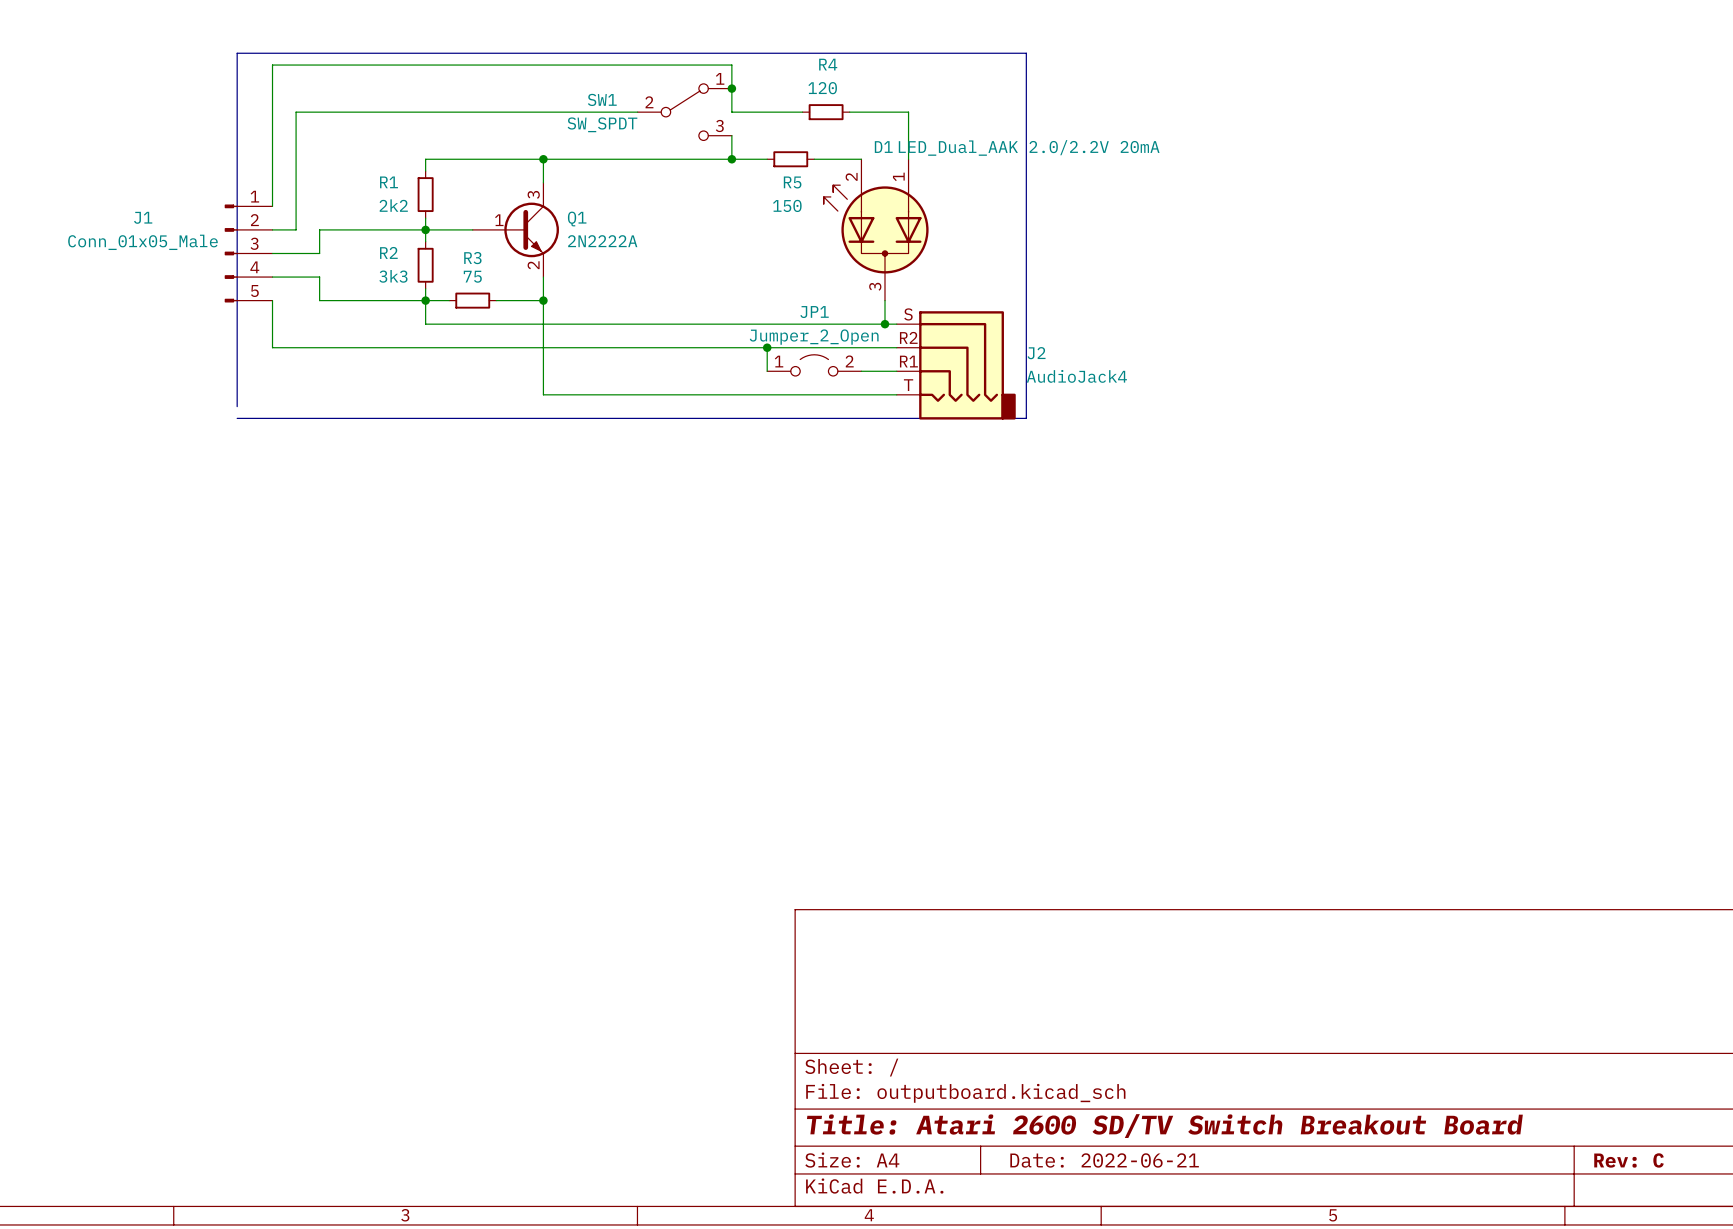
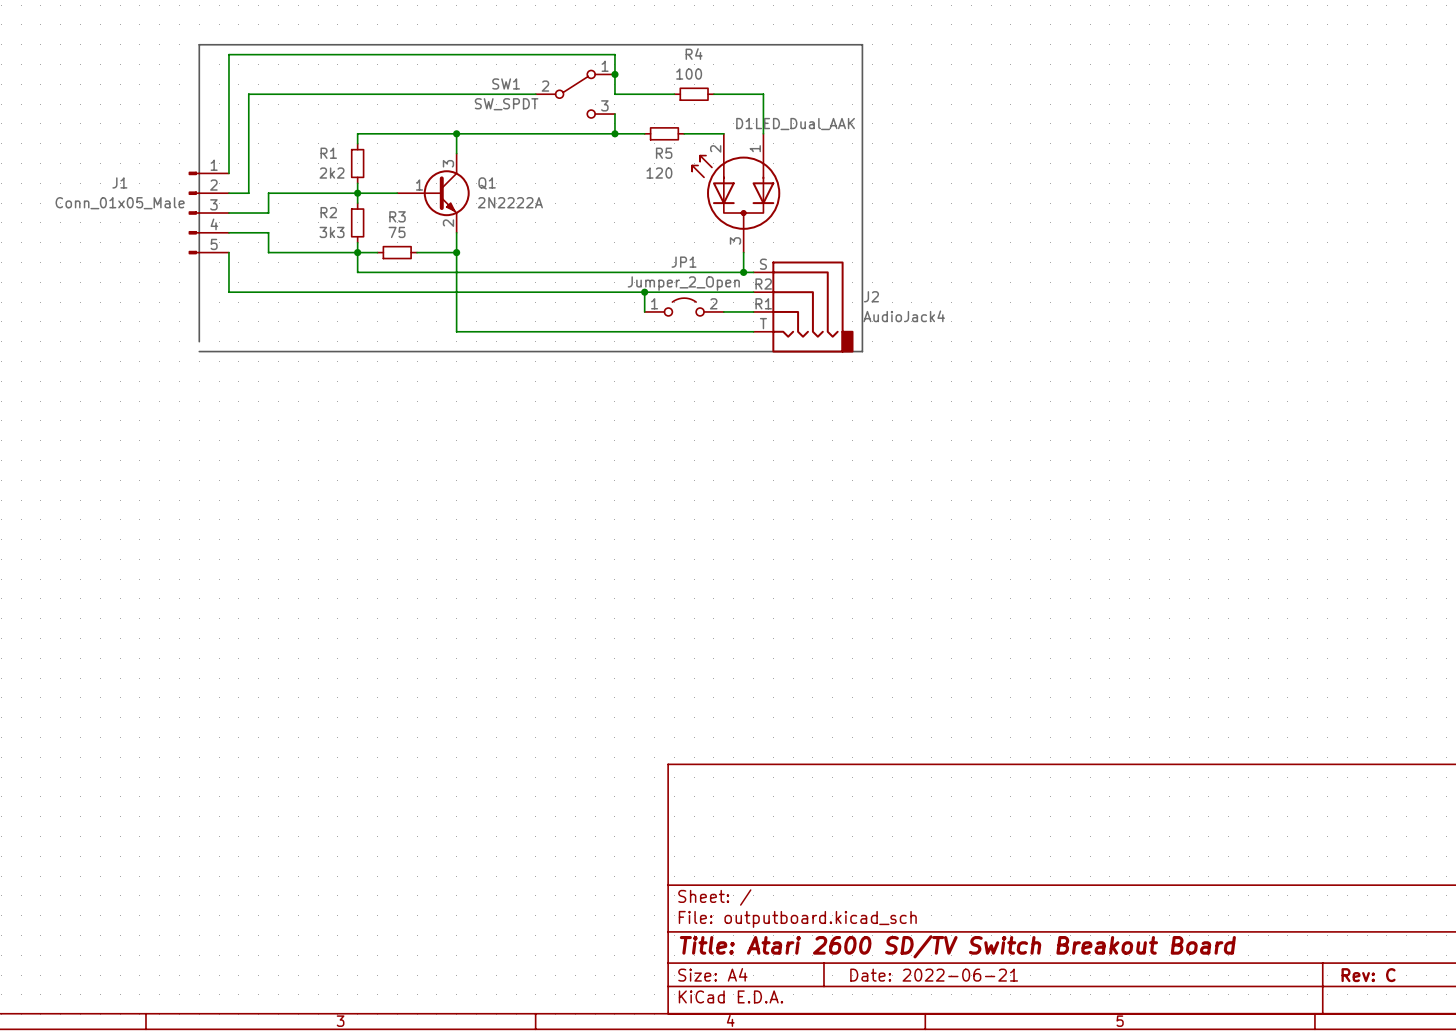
R4 value: 120 (822, 88) -> 100 (689, 74)
D1 value: LED_Dual_AAK 2.0/2.2V 20mA (1029, 147) -> LED_Dual_AAK (805, 124)
R5 value: 150 (787, 205) -> 120 (659, 173)

